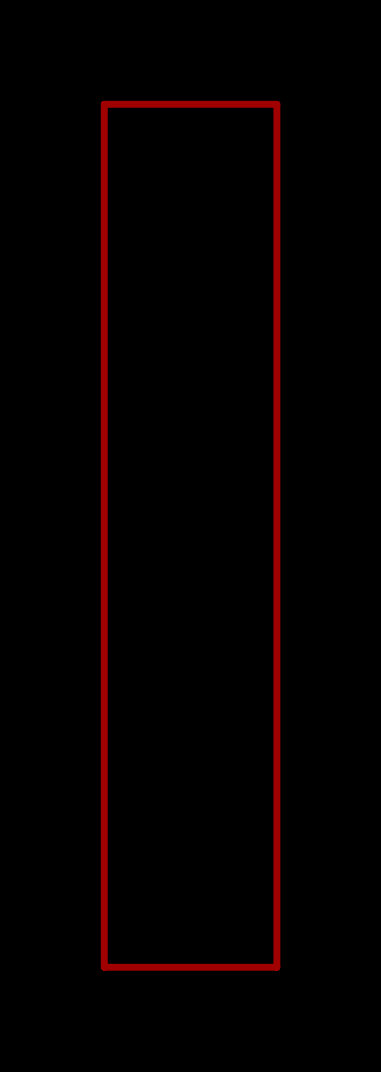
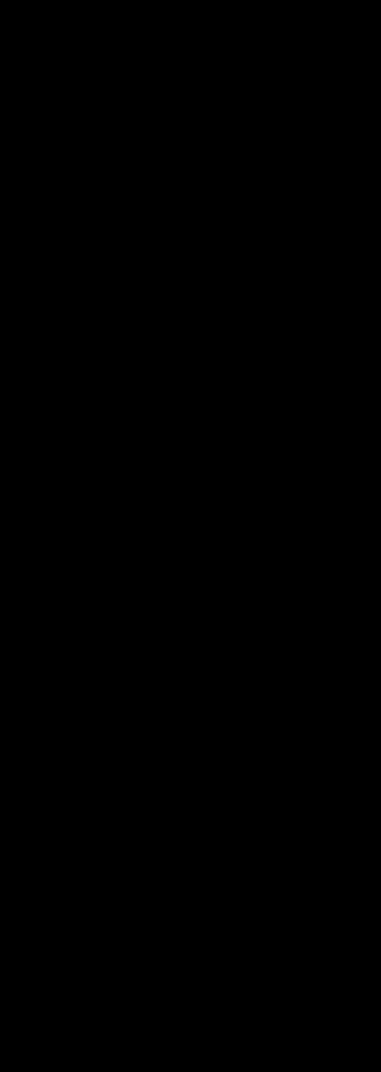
top track: (104, 104) (276, 104) (276, 967) (104, 967) (104, 104) -> none

